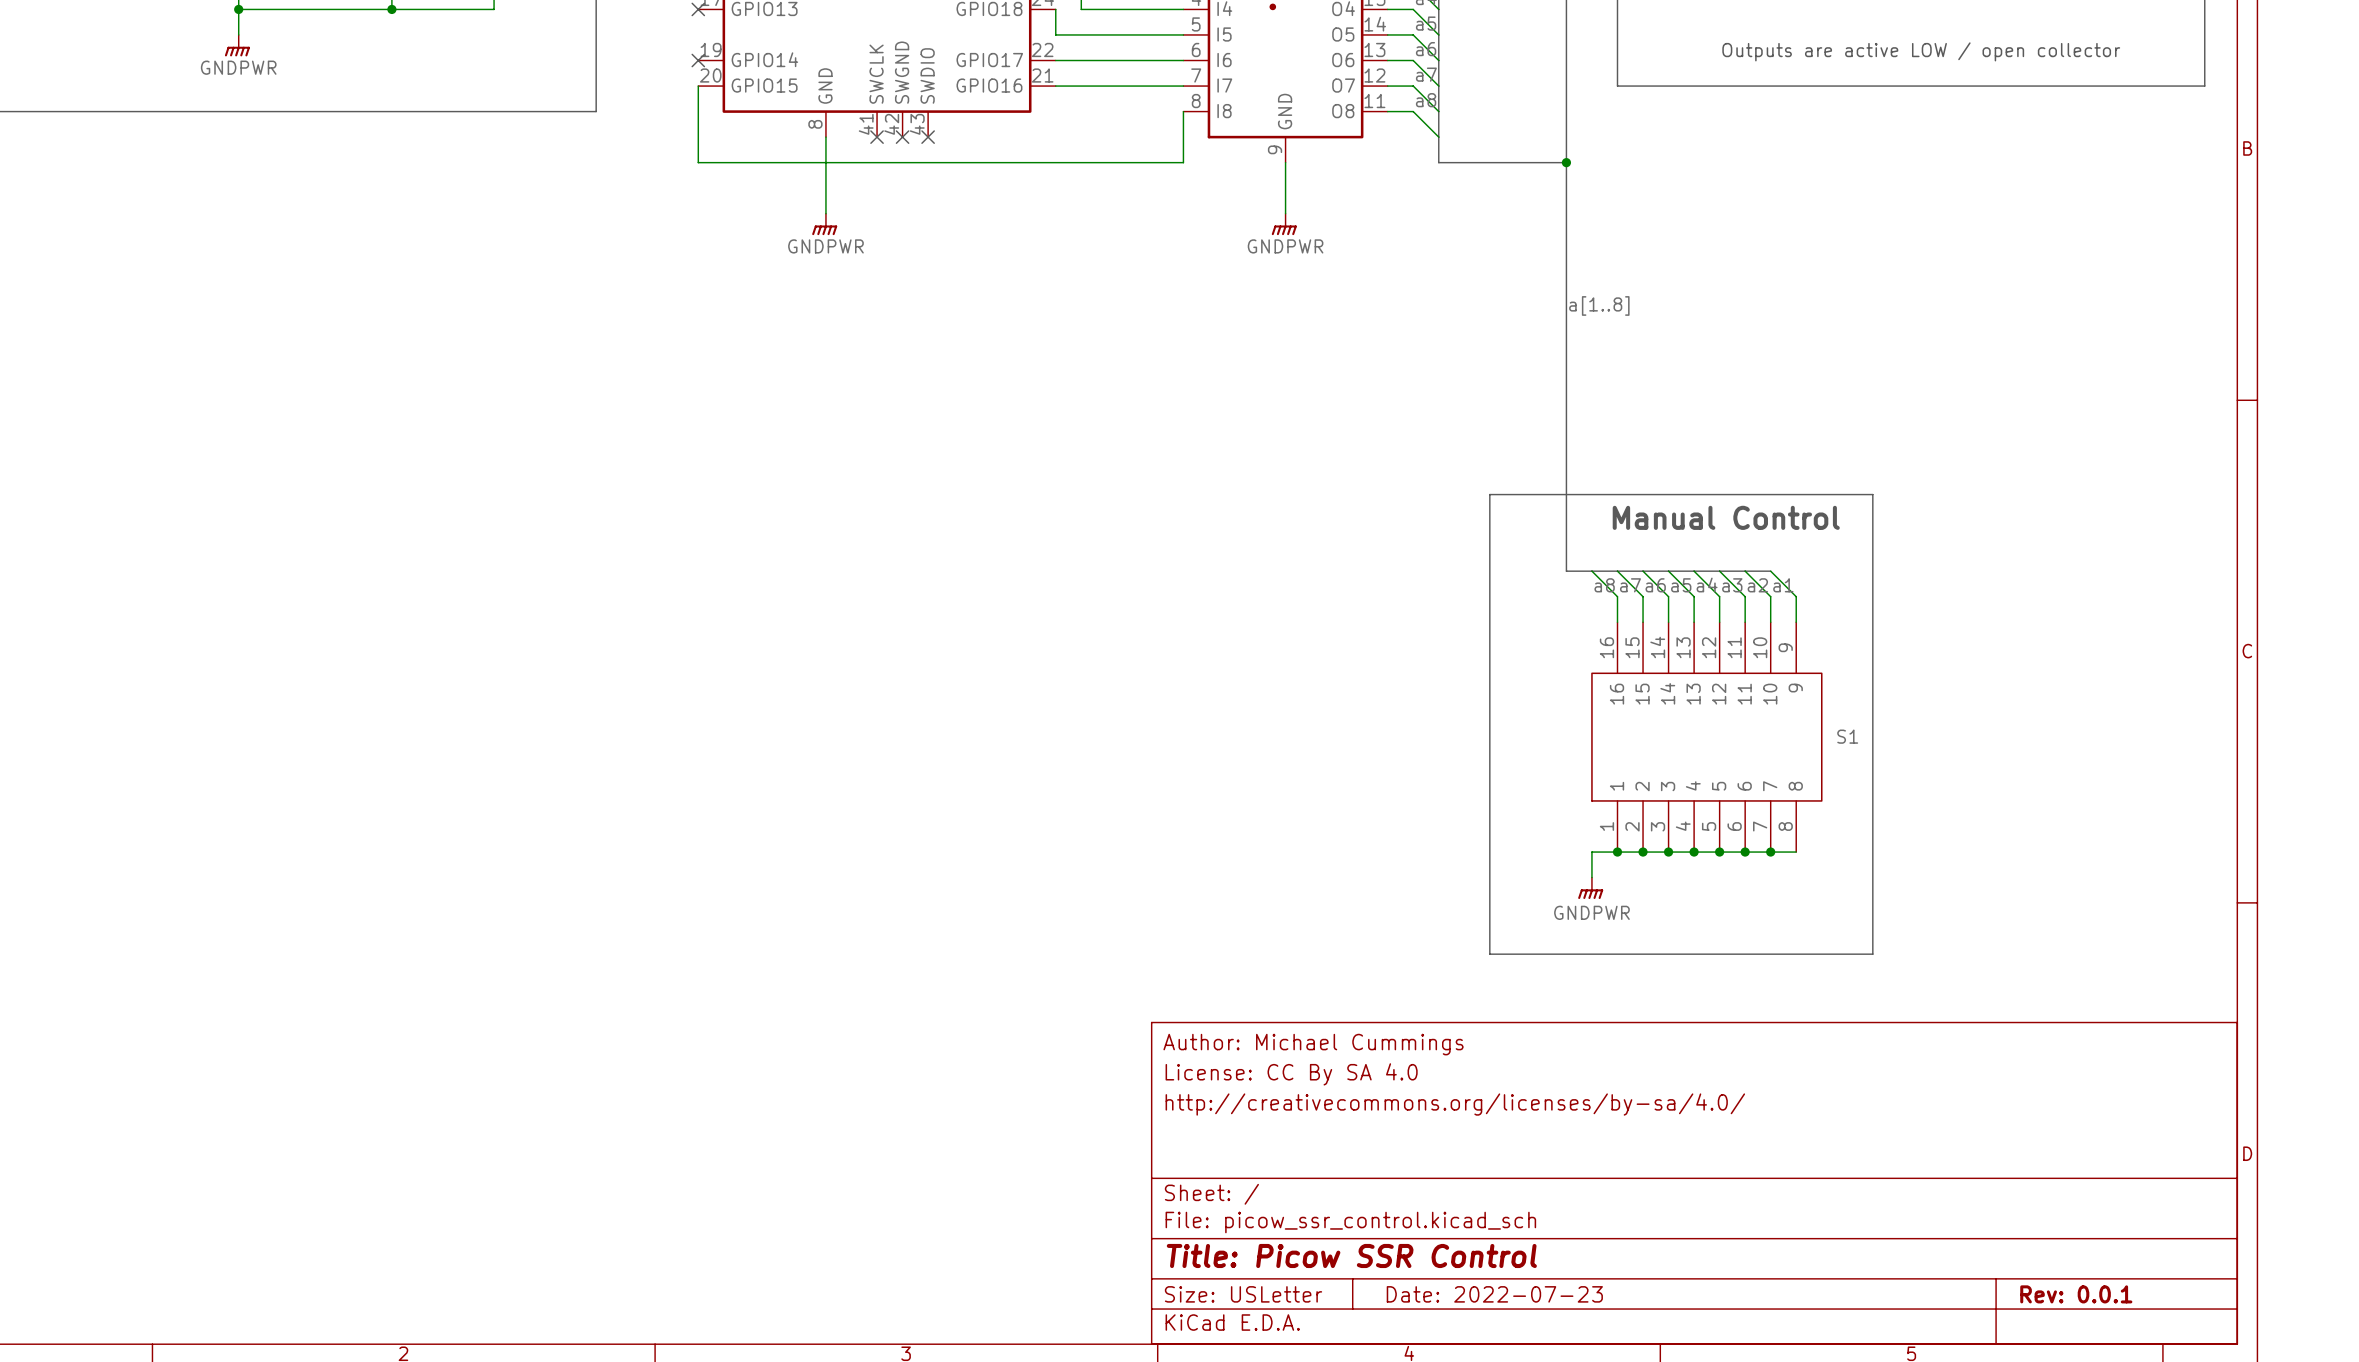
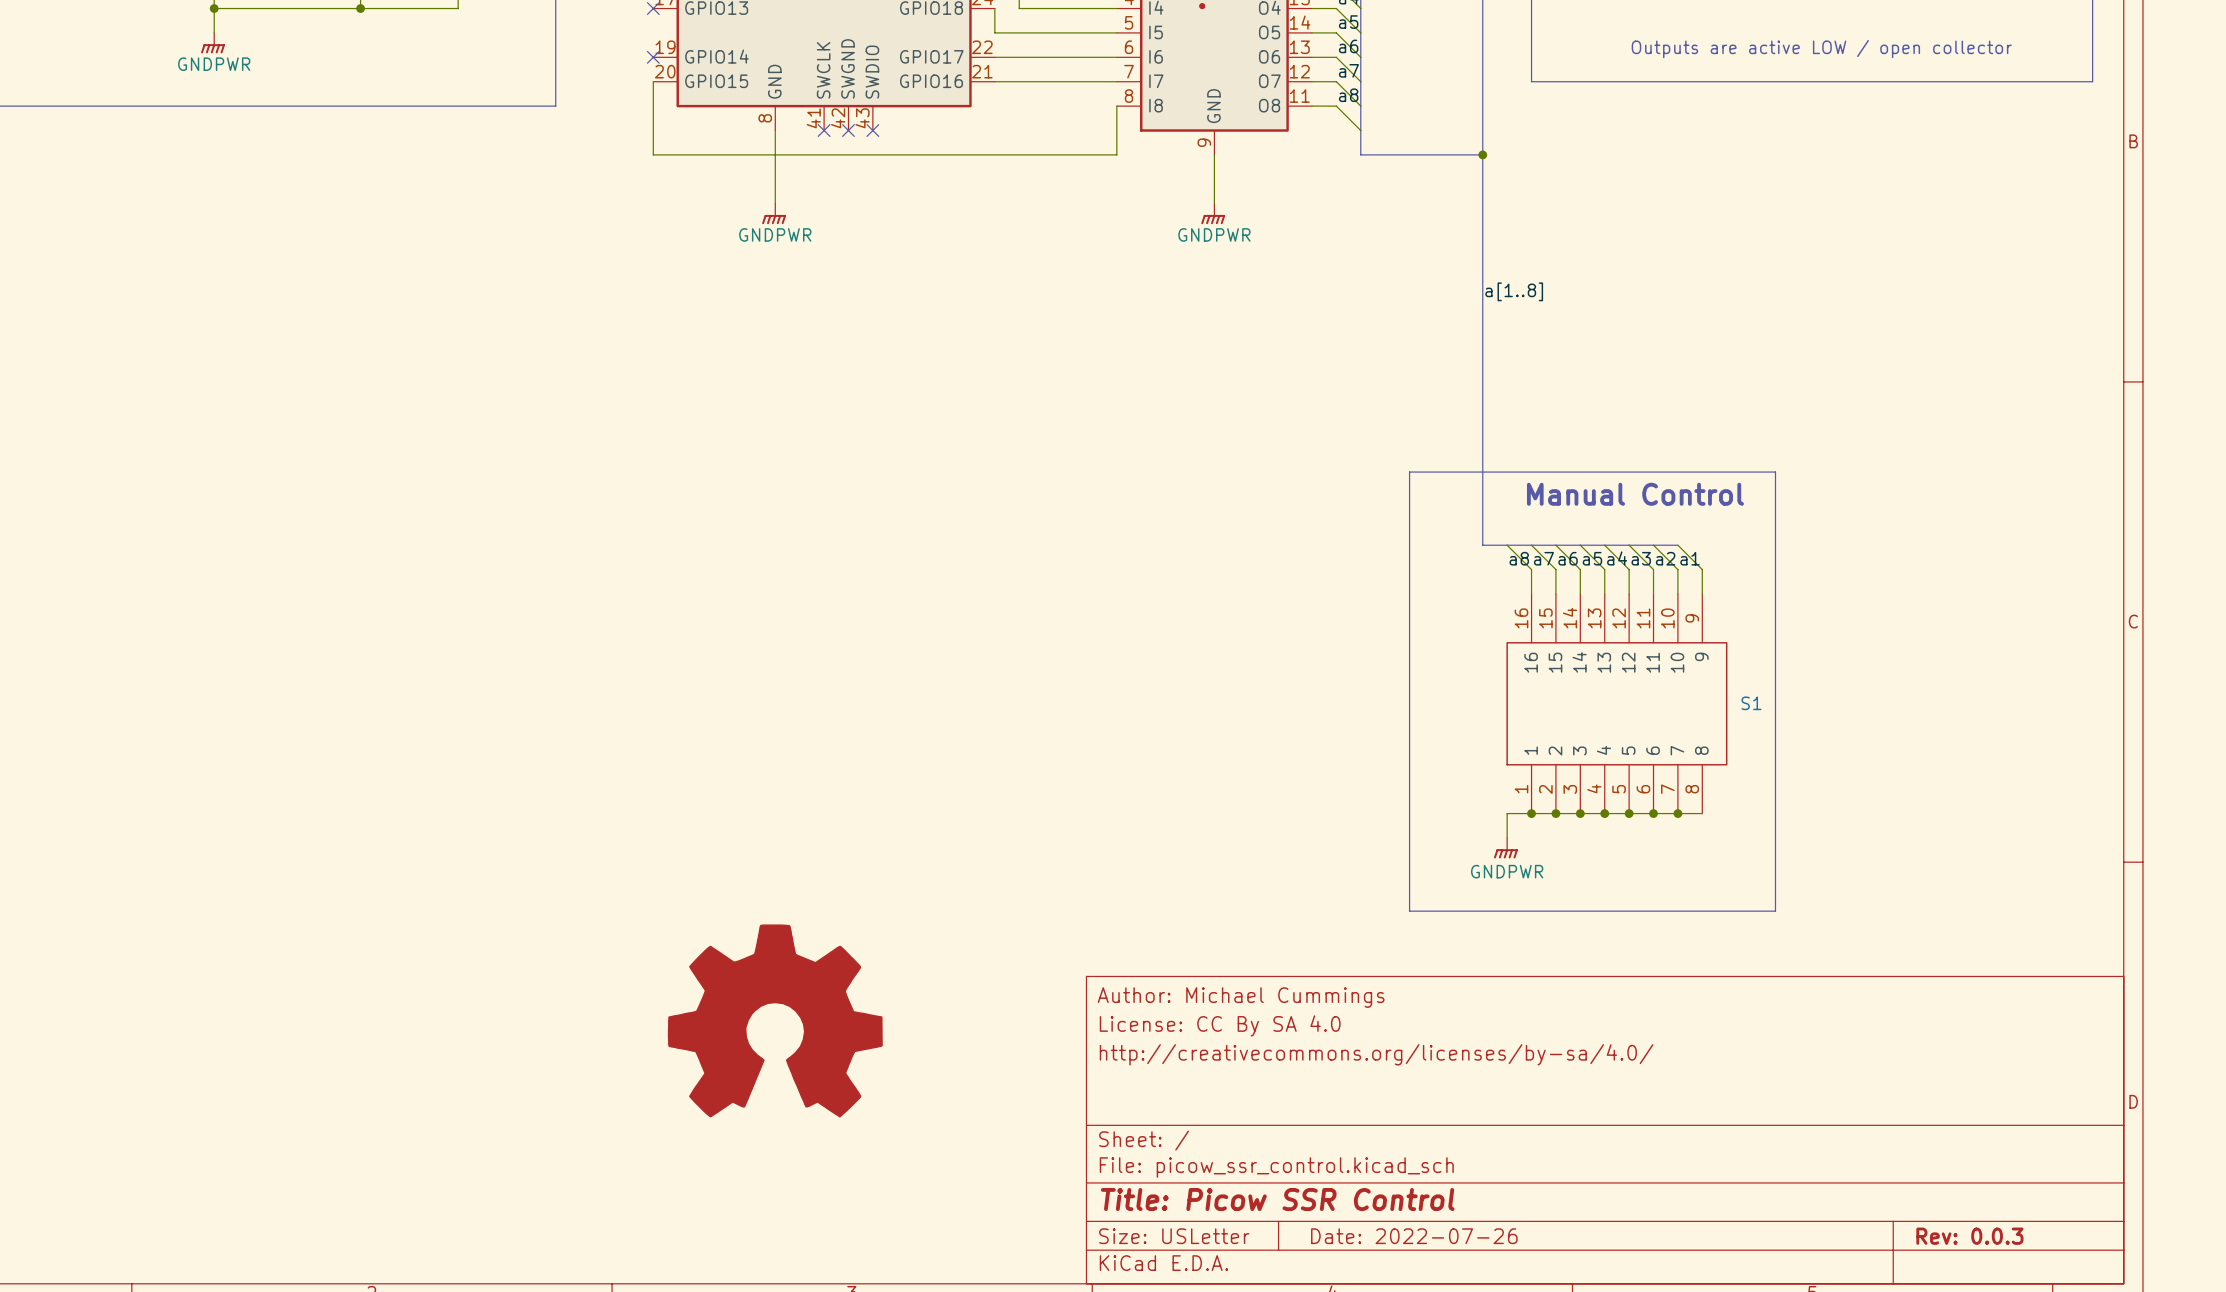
power symbol: none -> (775, 1020)
title block: Date: 2022-07-23 (1494, 1294) -> Date: 2022-07-26 (1414, 1236)
title block: Rev: 0.0.1 (2076, 1294) -> Rev: 0.0.3 (1969, 1236)

